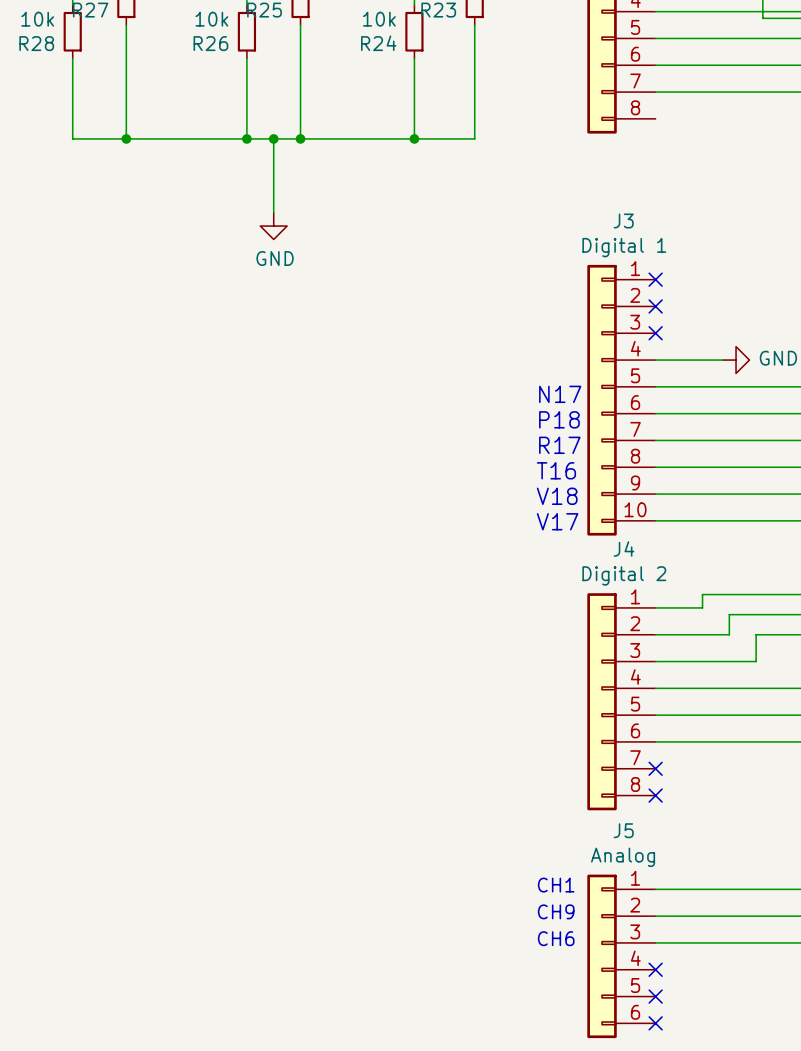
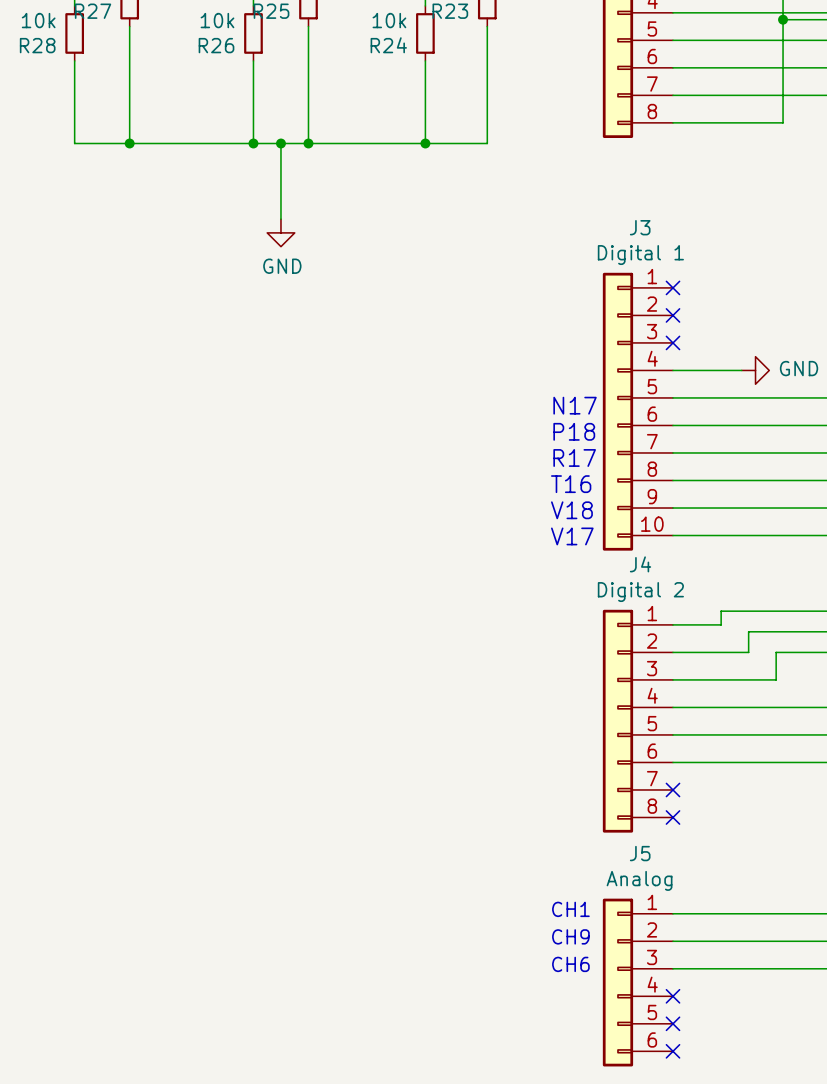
wire: none -> (783, 19) (783, 122) (672, 122)
junction: none -> (783, 19)

